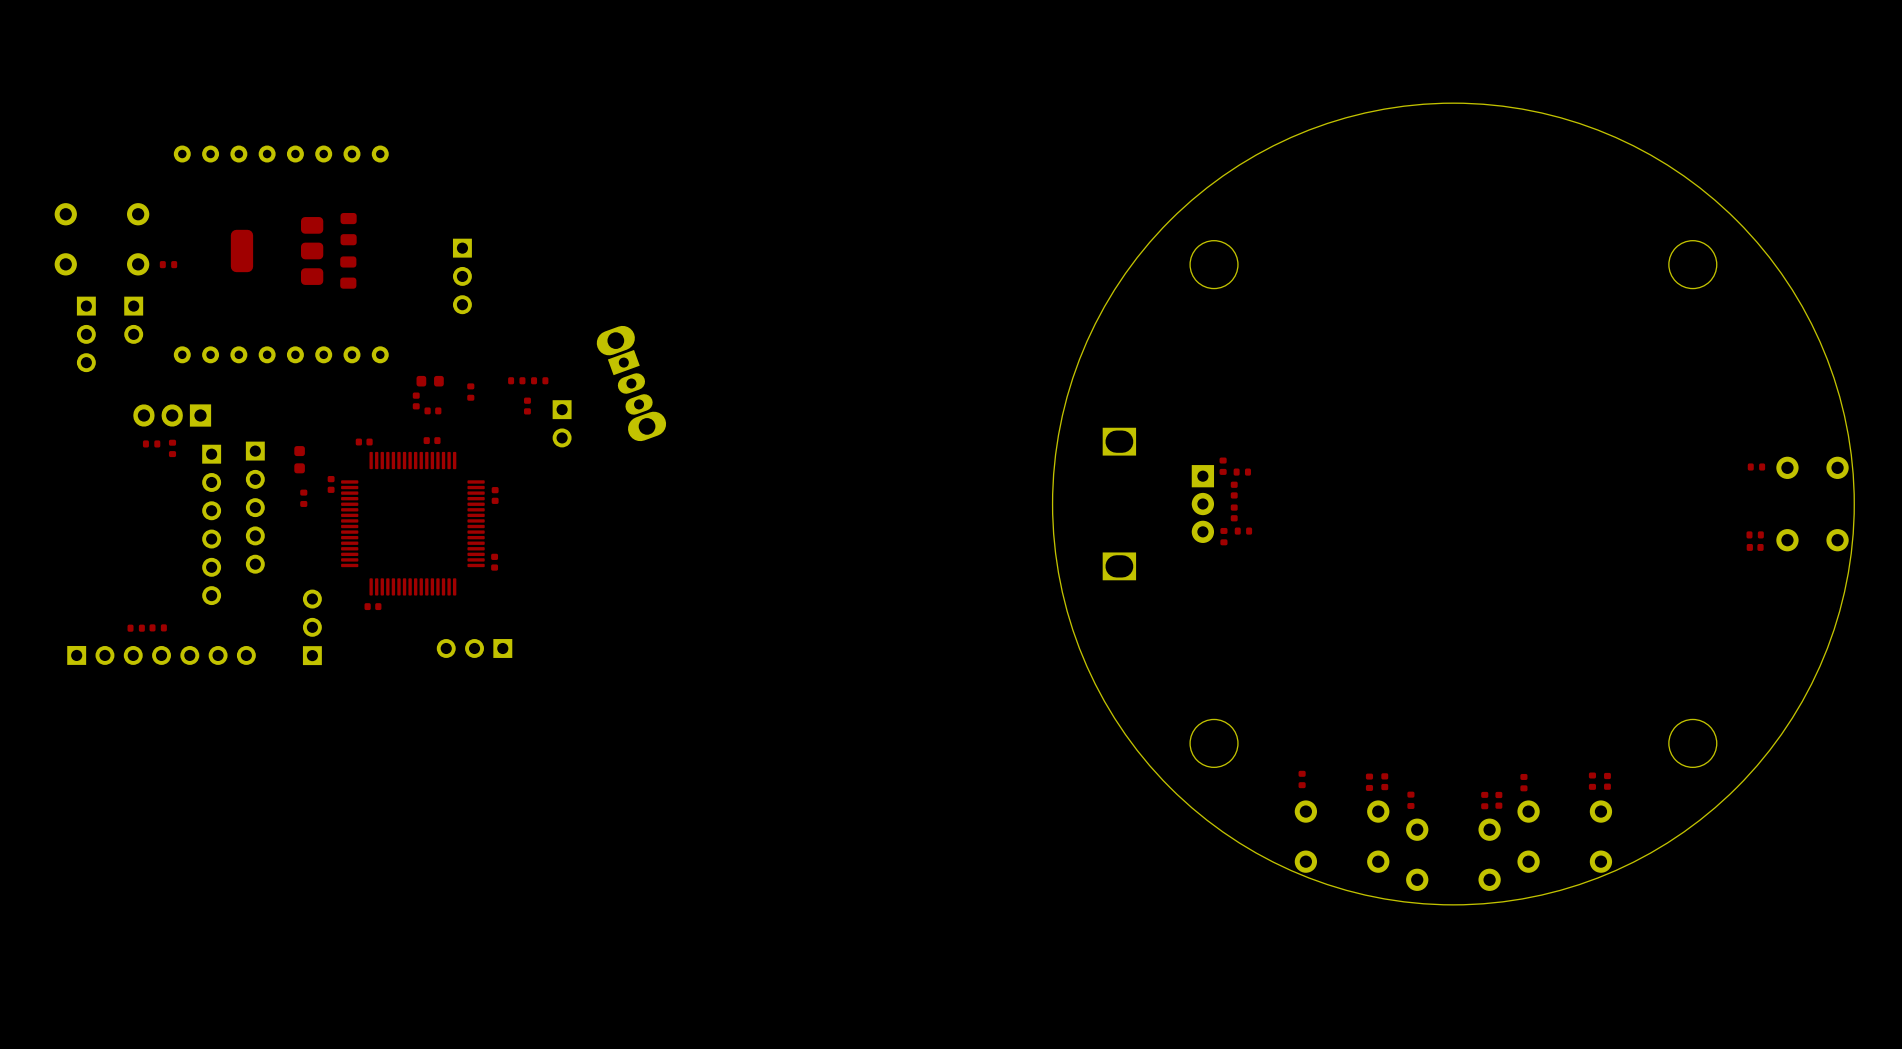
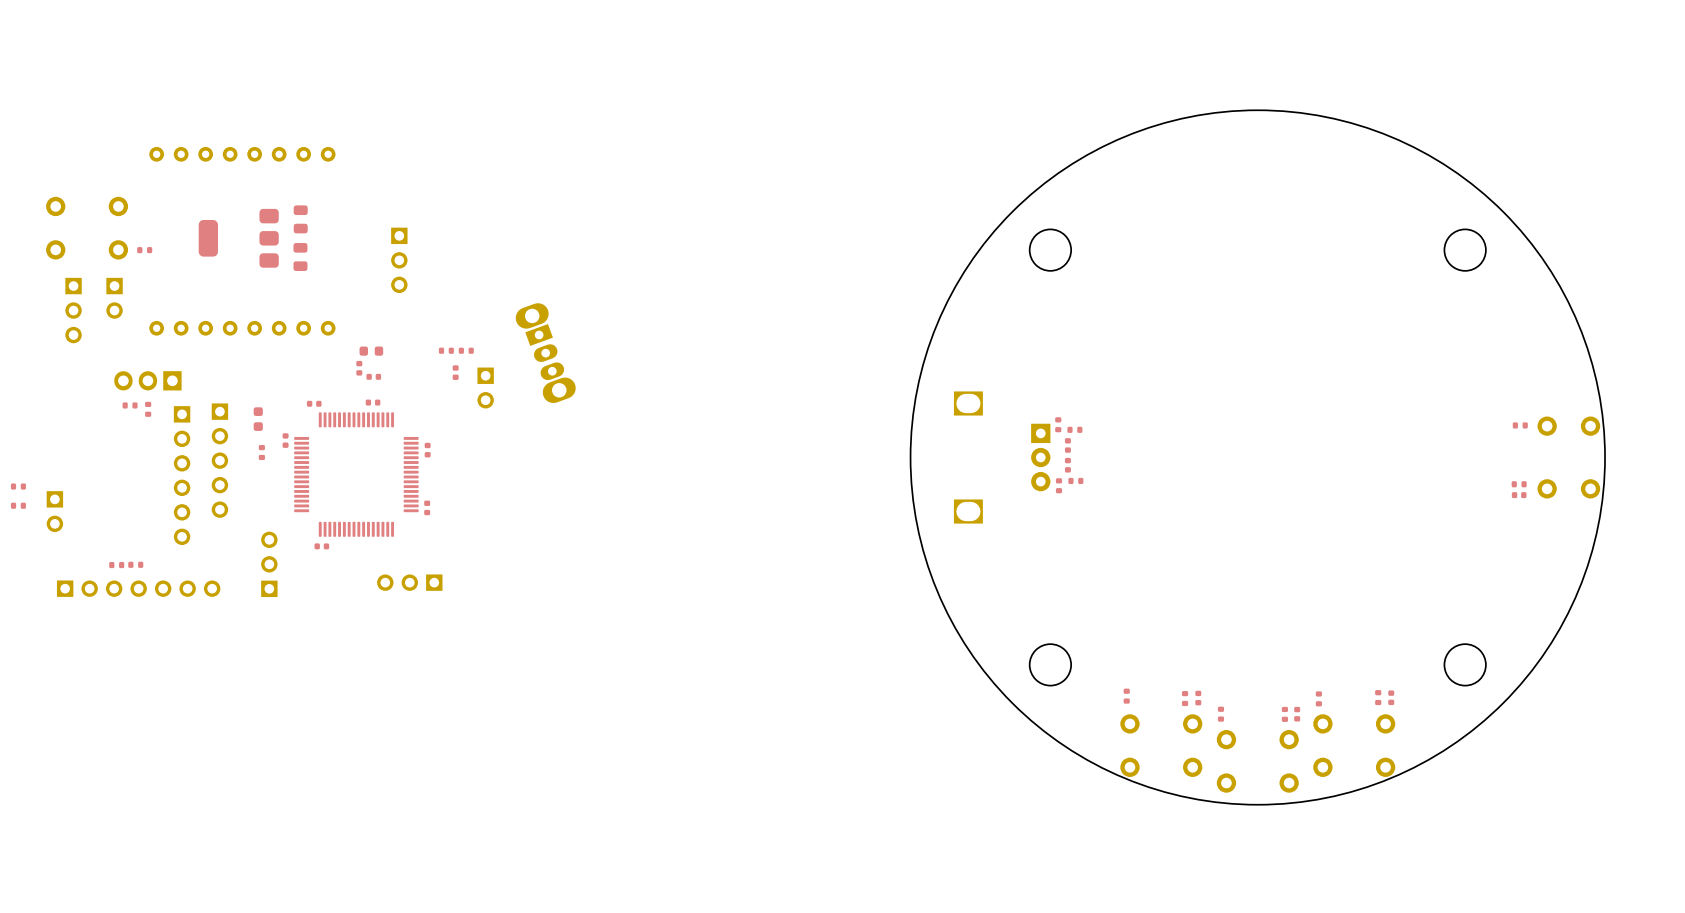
part: (470, 392) -> none
part: none -> (18, 486)
part: none -> (18, 505)
part: none -> (54, 511)

